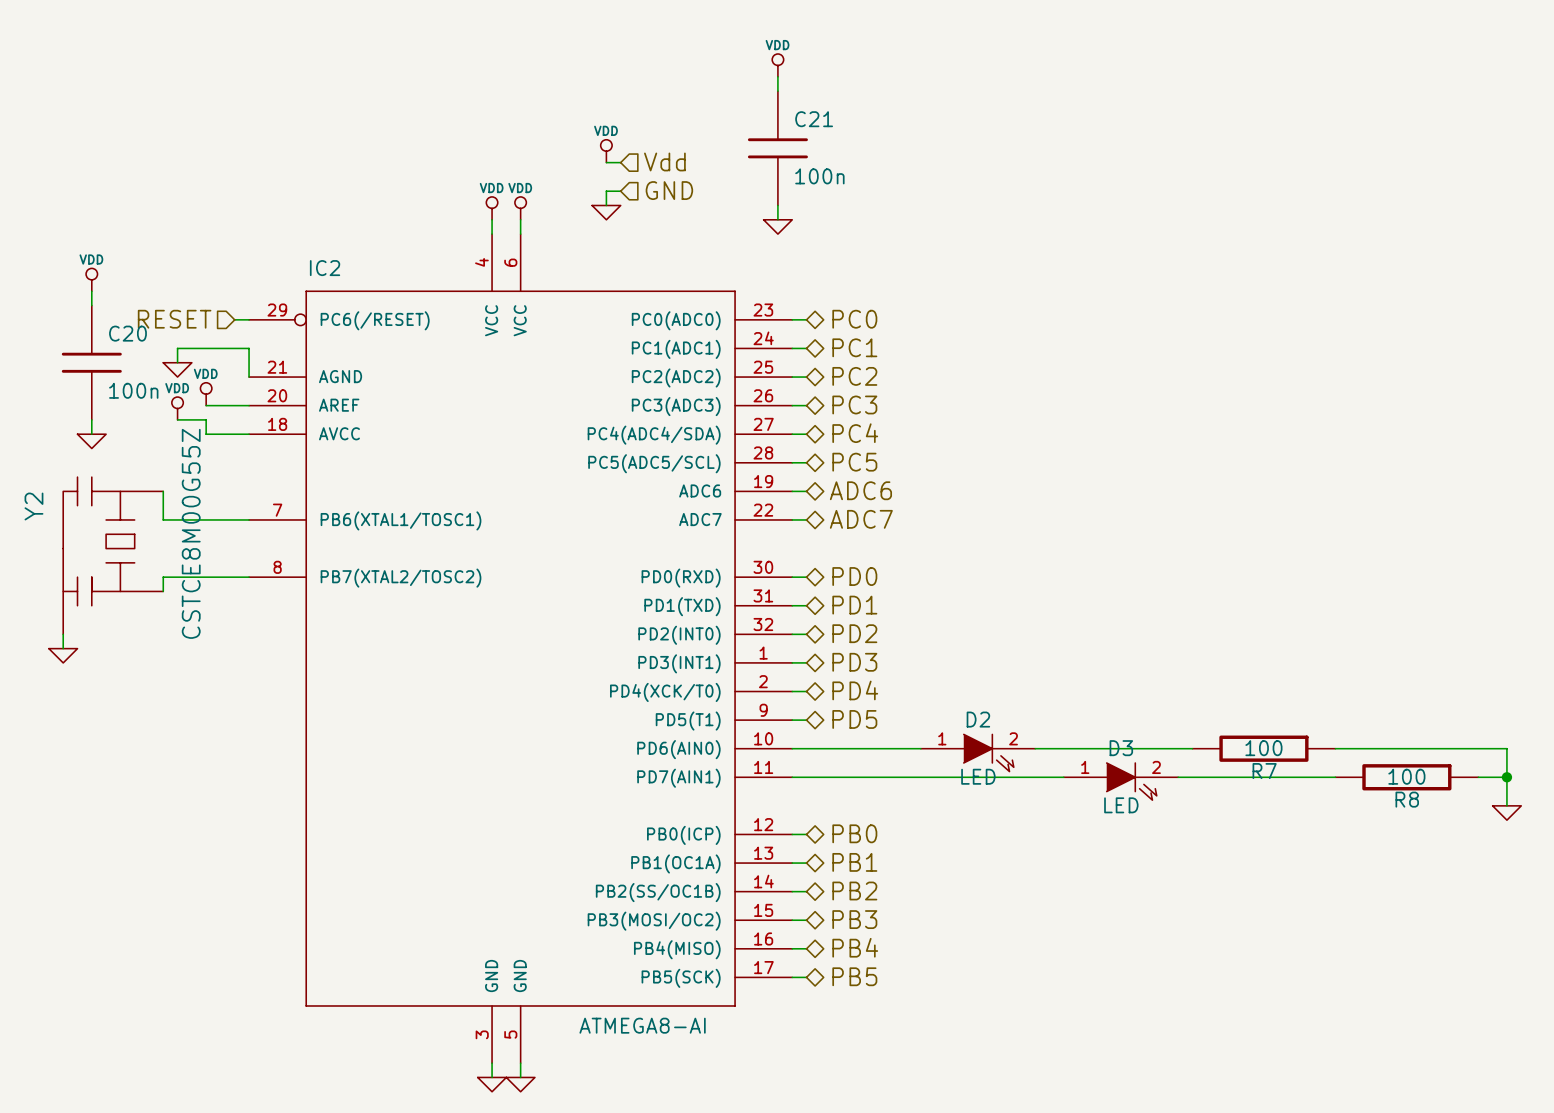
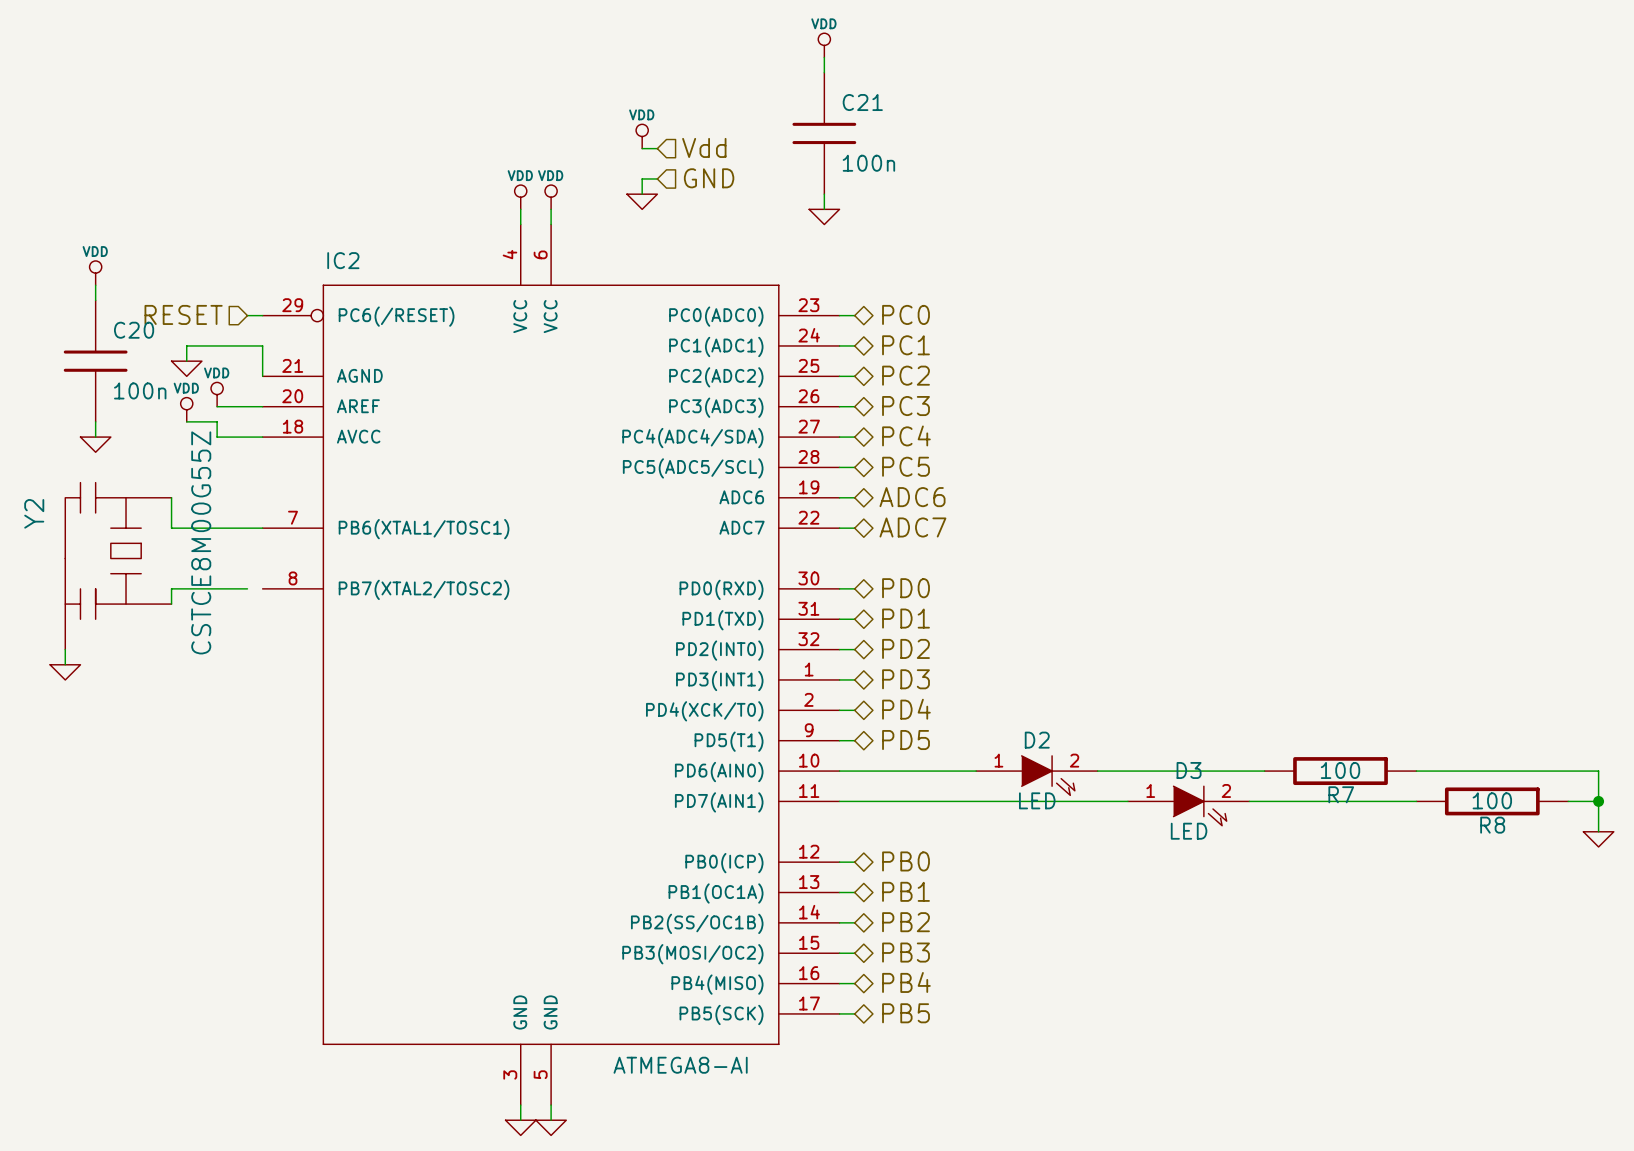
wire: (234, 577) (249, 577) -> none

